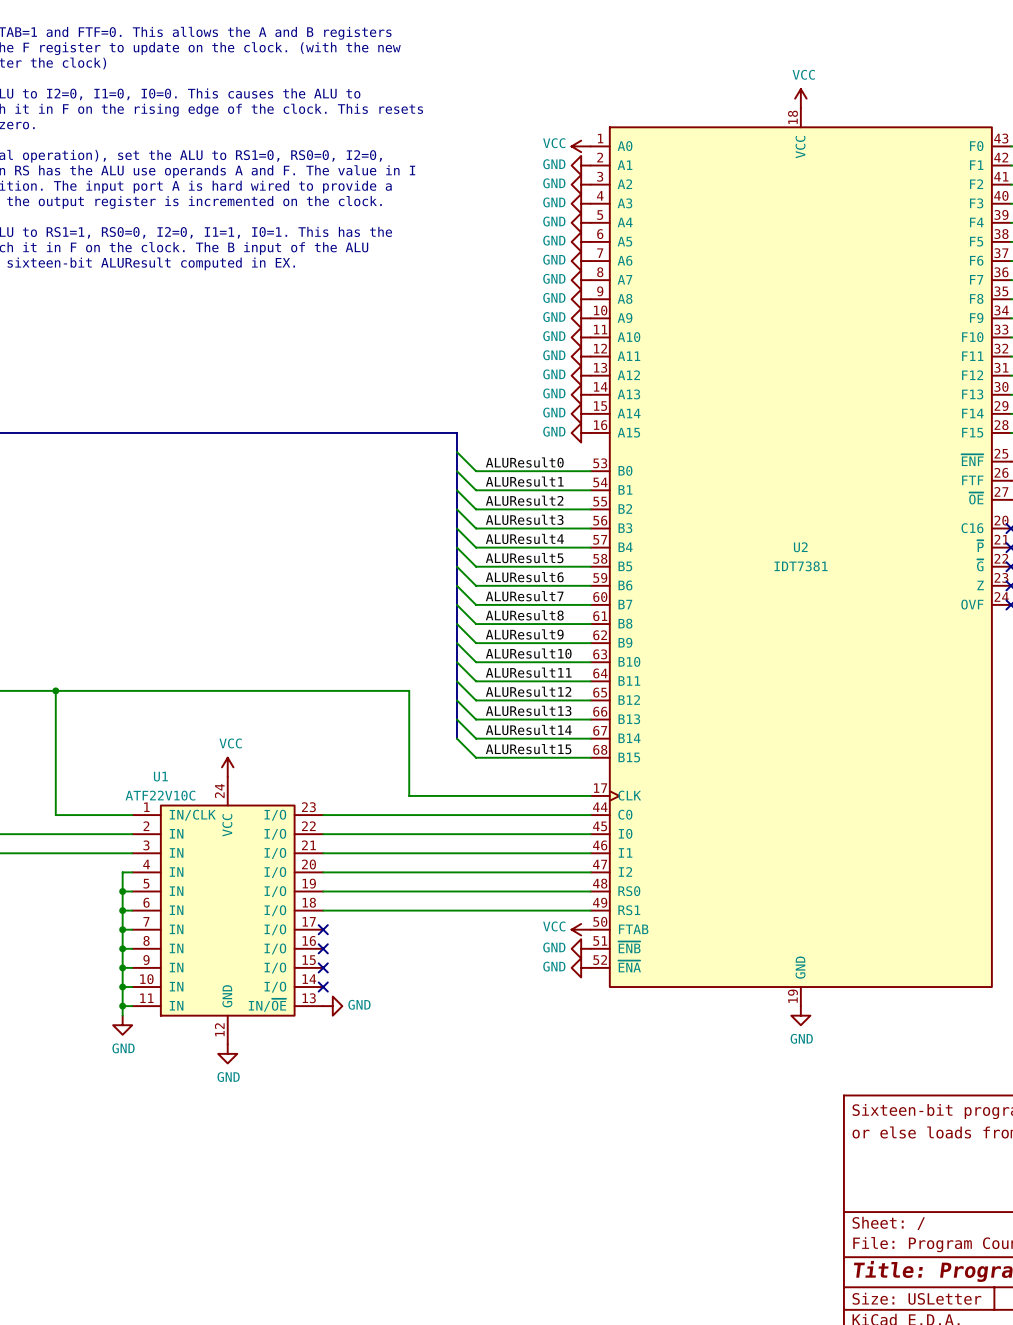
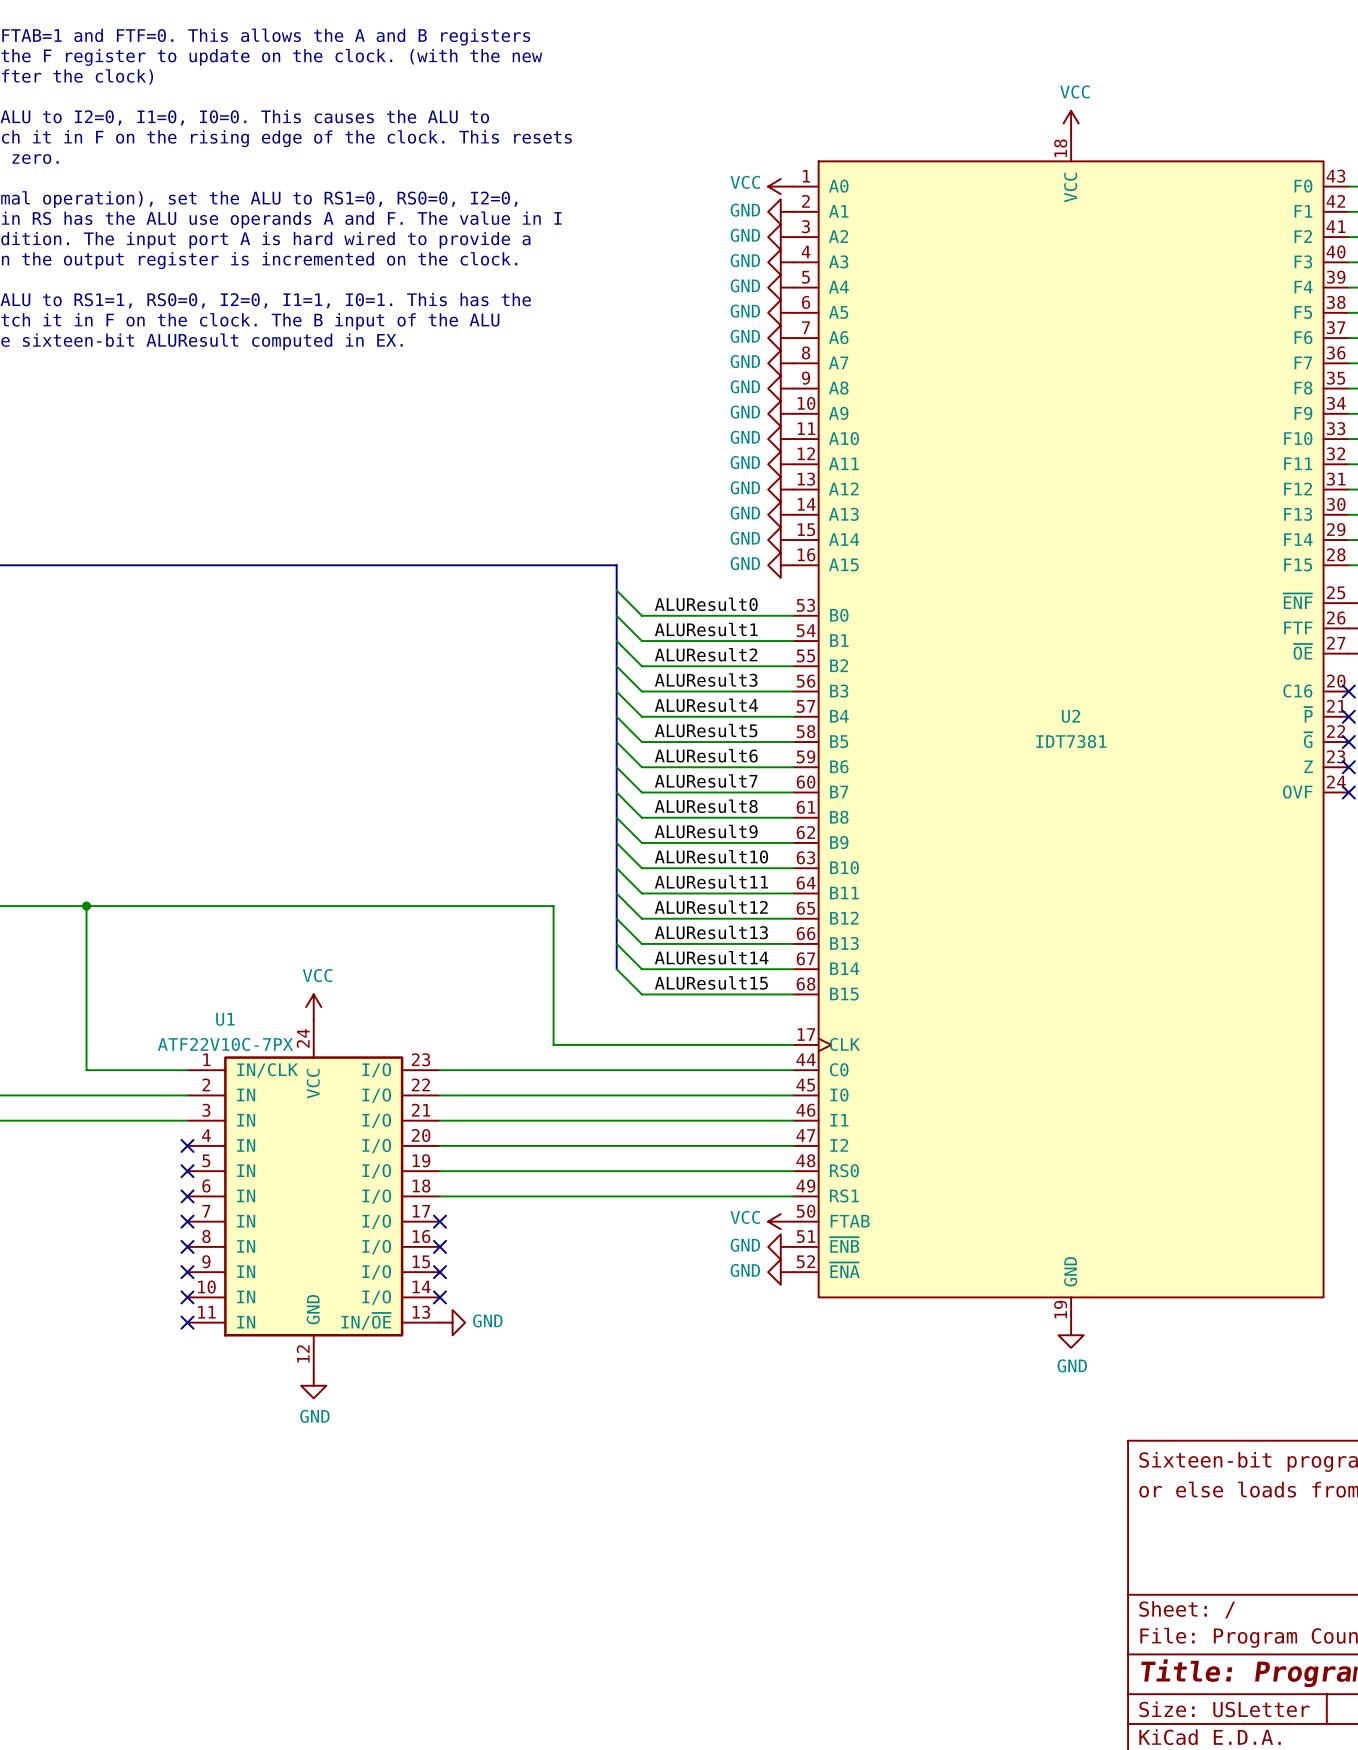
U1 value: ATF22V10C (160, 795) -> ATF22V10C-7PX (225, 1044)
wire: (132, 872) (122, 872) (122, 1015) -> none
no-connect mark: none -> (187, 1145)
wire: (122, 891) (132, 891) -> none
junction: (122, 891) -> none
no-connect mark: none -> (187, 1171)
wire: (122, 910) (132, 910) -> none
junction: (122, 910) -> none
no-connect mark: none -> (187, 1196)
wire: (122, 929) (132, 929) -> none
junction: (122, 929) -> none
no-connect mark: none -> (187, 1221)
wire: (122, 948) (132, 948) -> none
junction: (122, 948) -> none
no-connect mark: none -> (187, 1246)
wire: (122, 967) (132, 967) -> none
junction: (122, 967) -> none
no-connect mark: none -> (187, 1272)
wire: (122, 987) (132, 987) -> none
junction: (122, 987) -> none
no-connect mark: none -> (187, 1297)
wire: (122, 1006) (132, 1006) -> none
junction: (122, 1006) -> none
no-connect mark: none -> (187, 1322)
power symbol: GND (122, 1025) -> none

